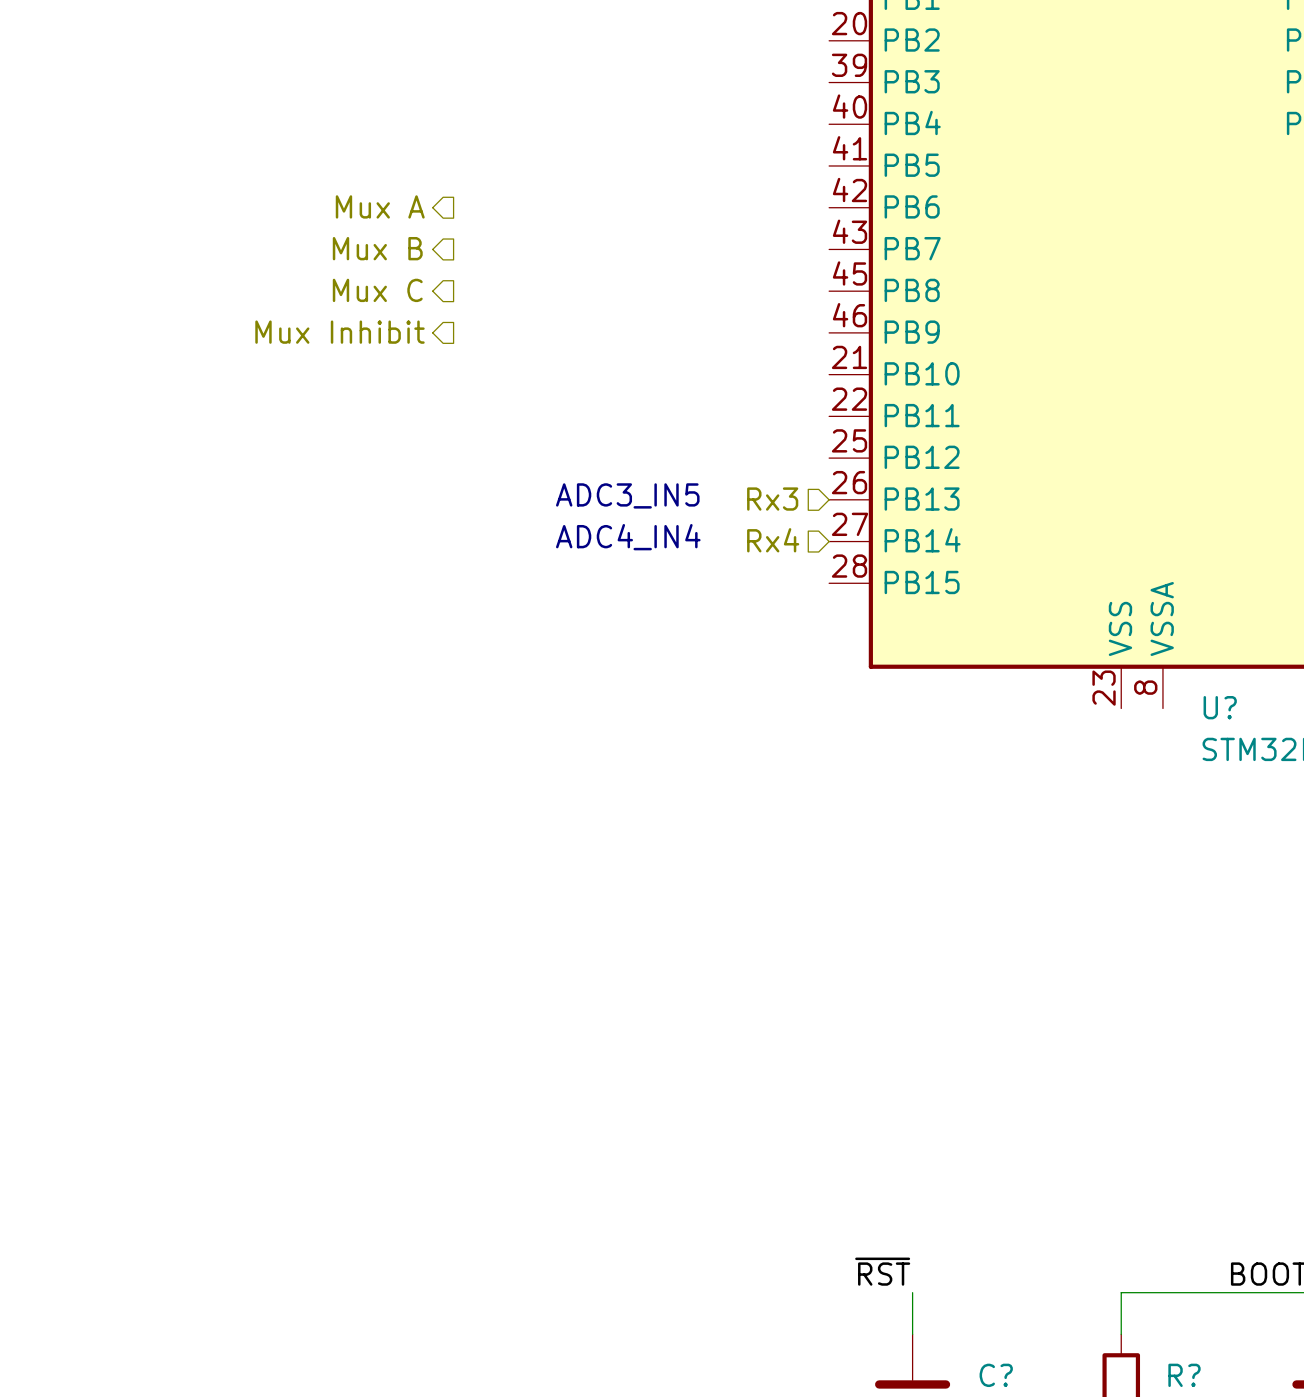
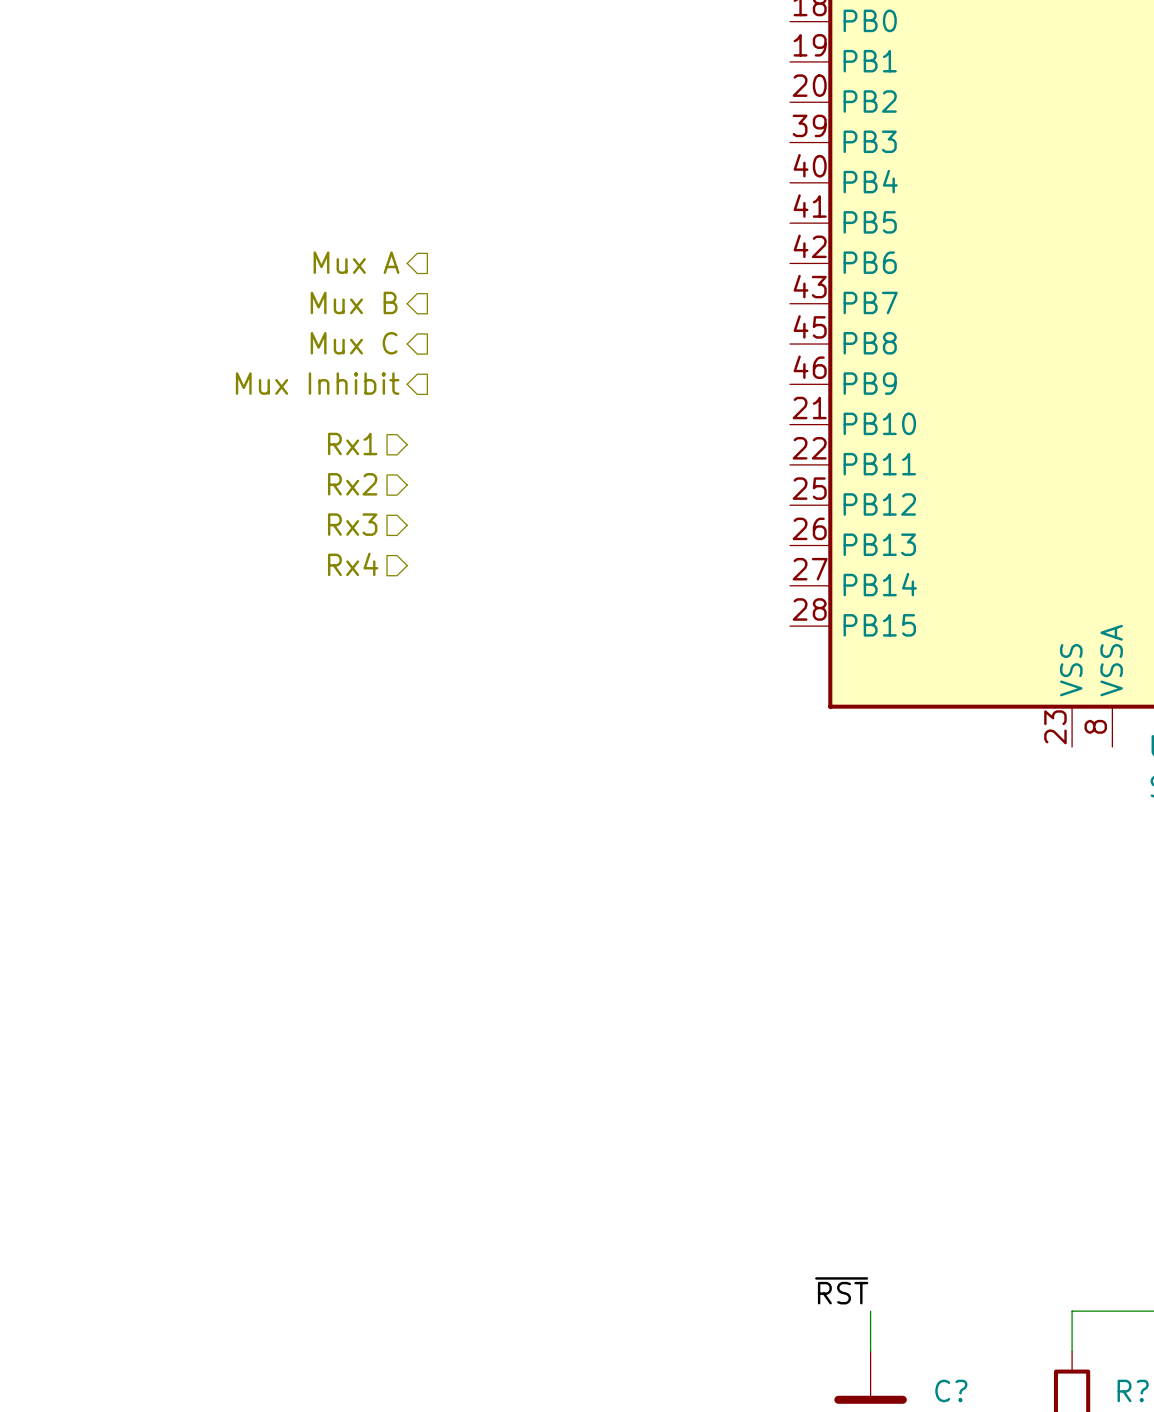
hierarchical label: none -> Rx1 (352, 444)
hierarchical label: none -> Rx2 (352, 484)
text: ADC3_IN5 (627, 495) -> none
hierarchical label position: Rx3 (772, 499) -> Rx3 (352, 524)
text: ADC4_IN4 (628, 537) -> none
hierarchical label position: Rx4 (773, 540) -> Rx4 (353, 564)

